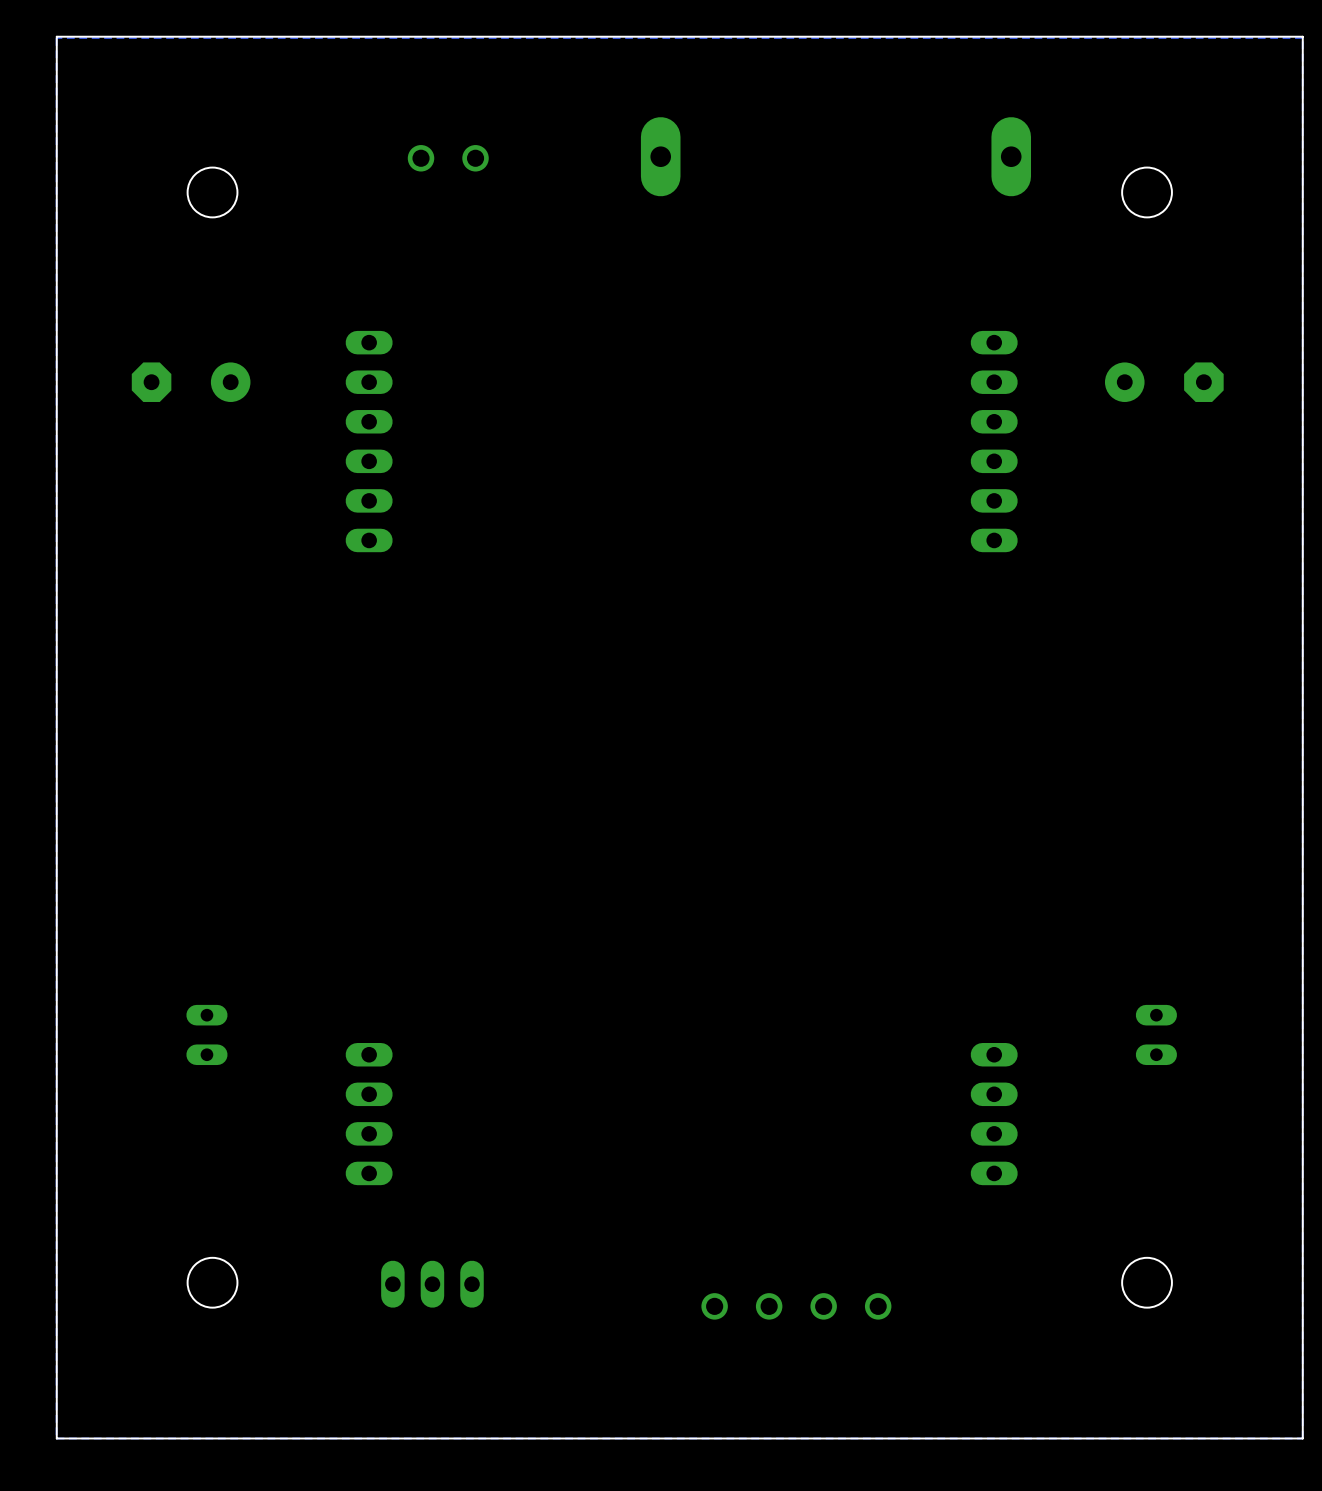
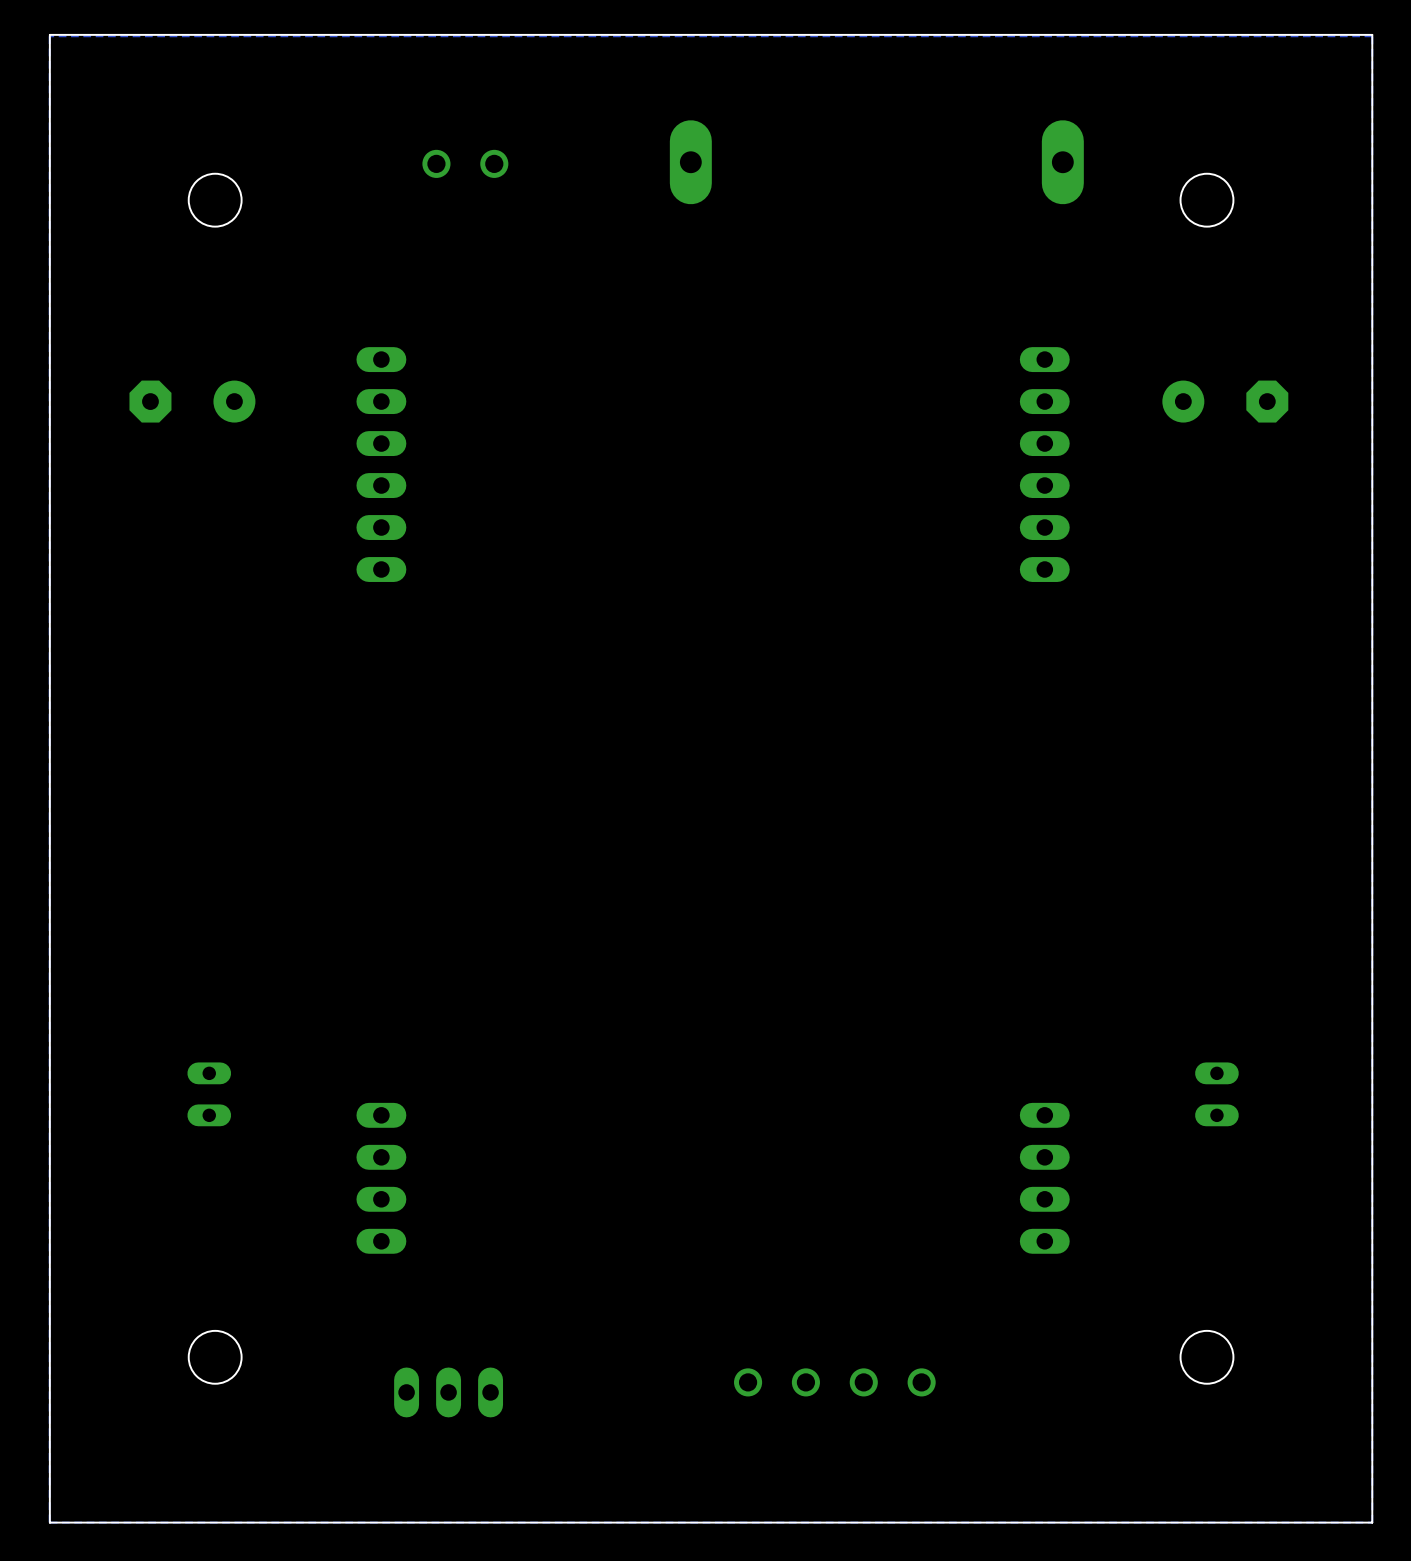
part position: (432, 1284) -> (448, 1392)

